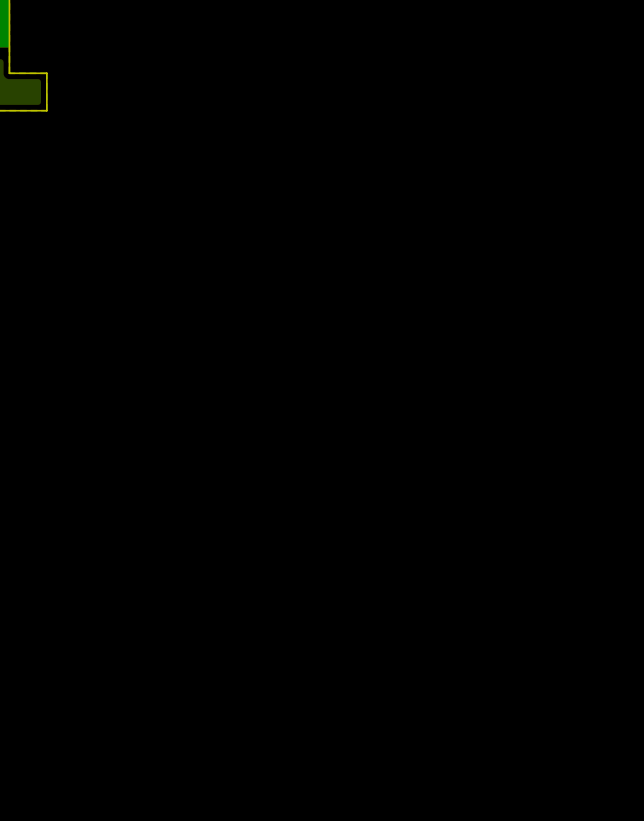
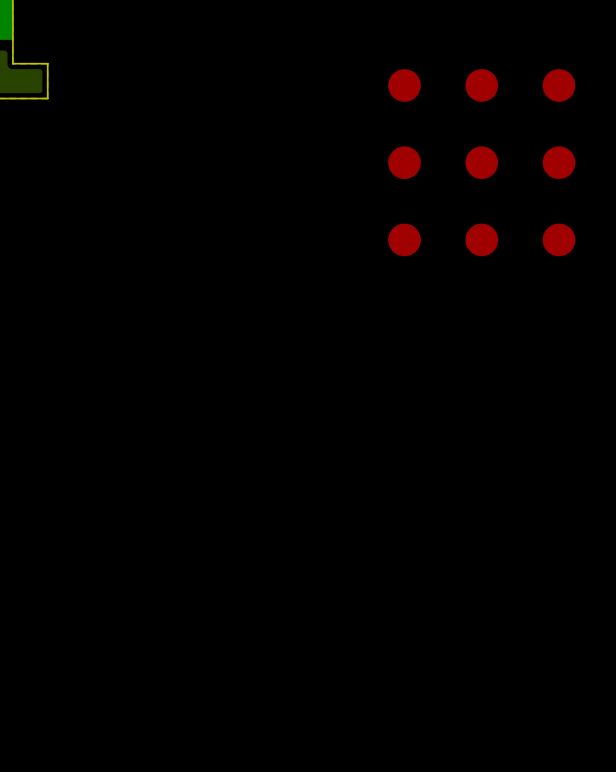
part: none -> (404, 85)
part: none -> (481, 85)
part: none -> (558, 85)
part: none -> (404, 162)
part: none -> (481, 162)
part: none -> (558, 162)
part: none -> (404, 239)
part: none -> (481, 239)
part: none -> (558, 239)

